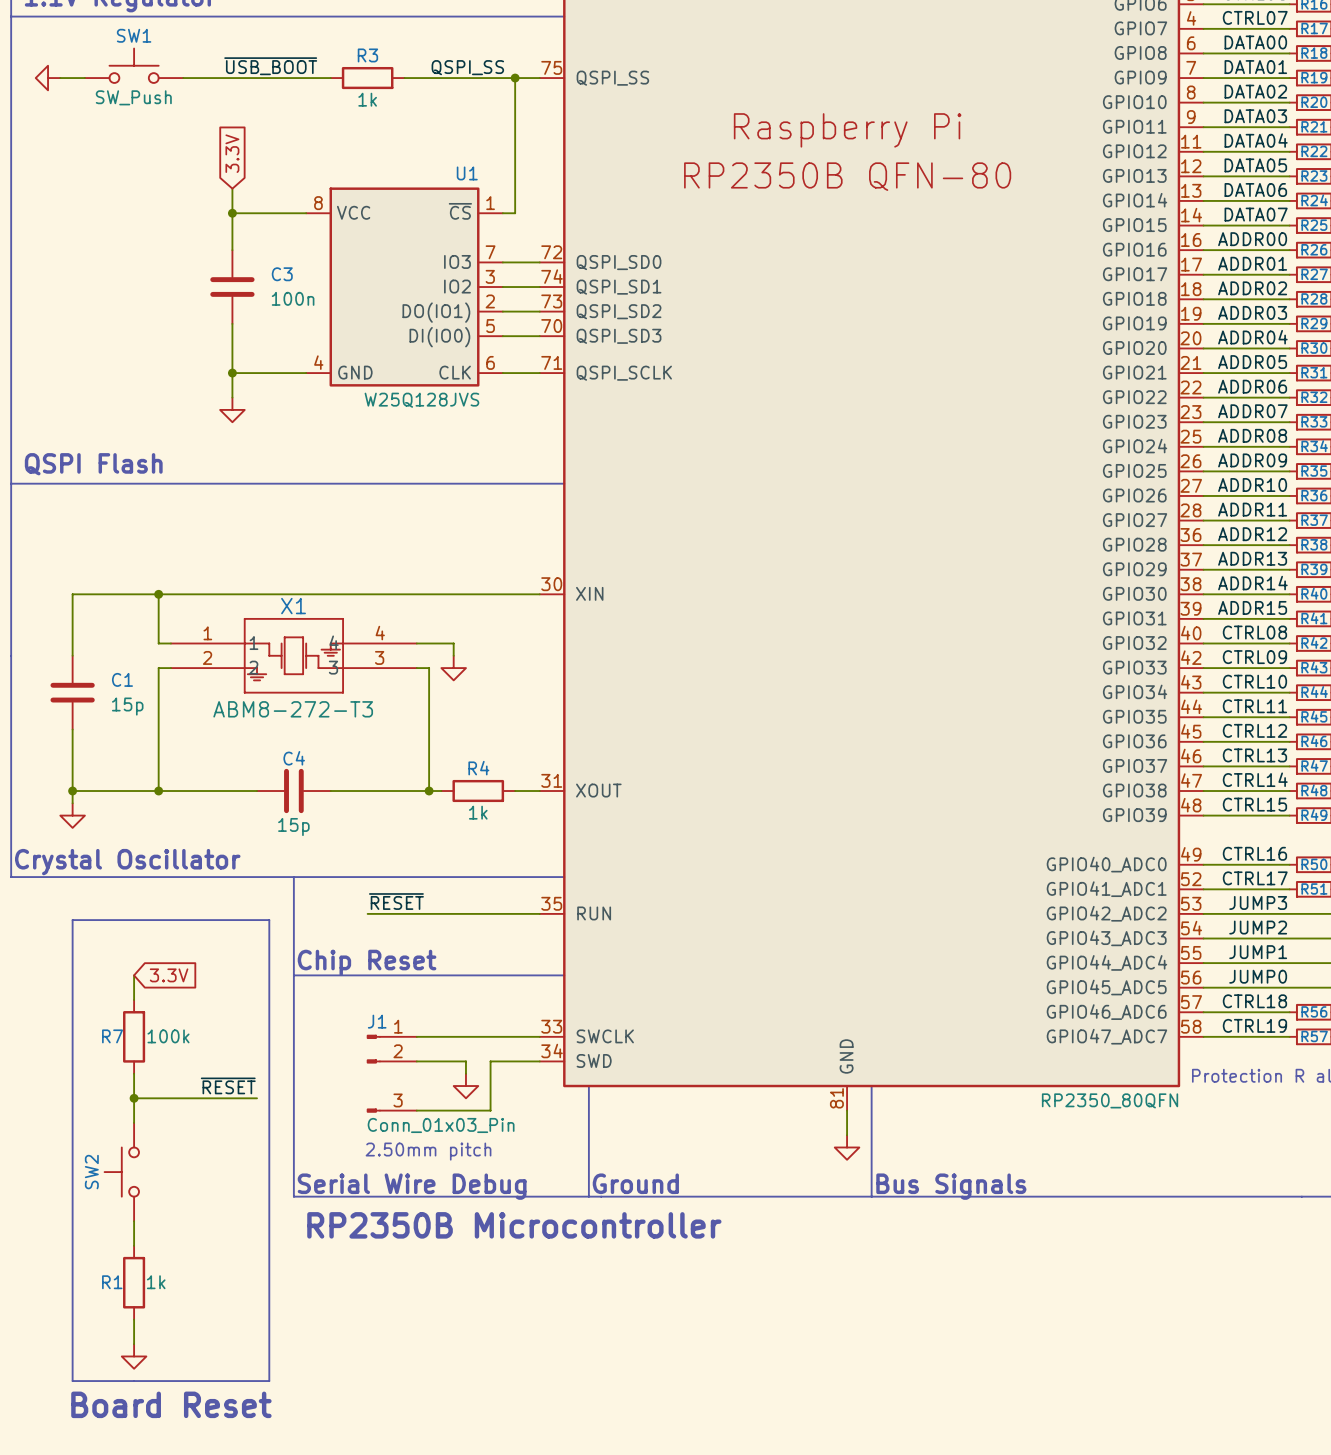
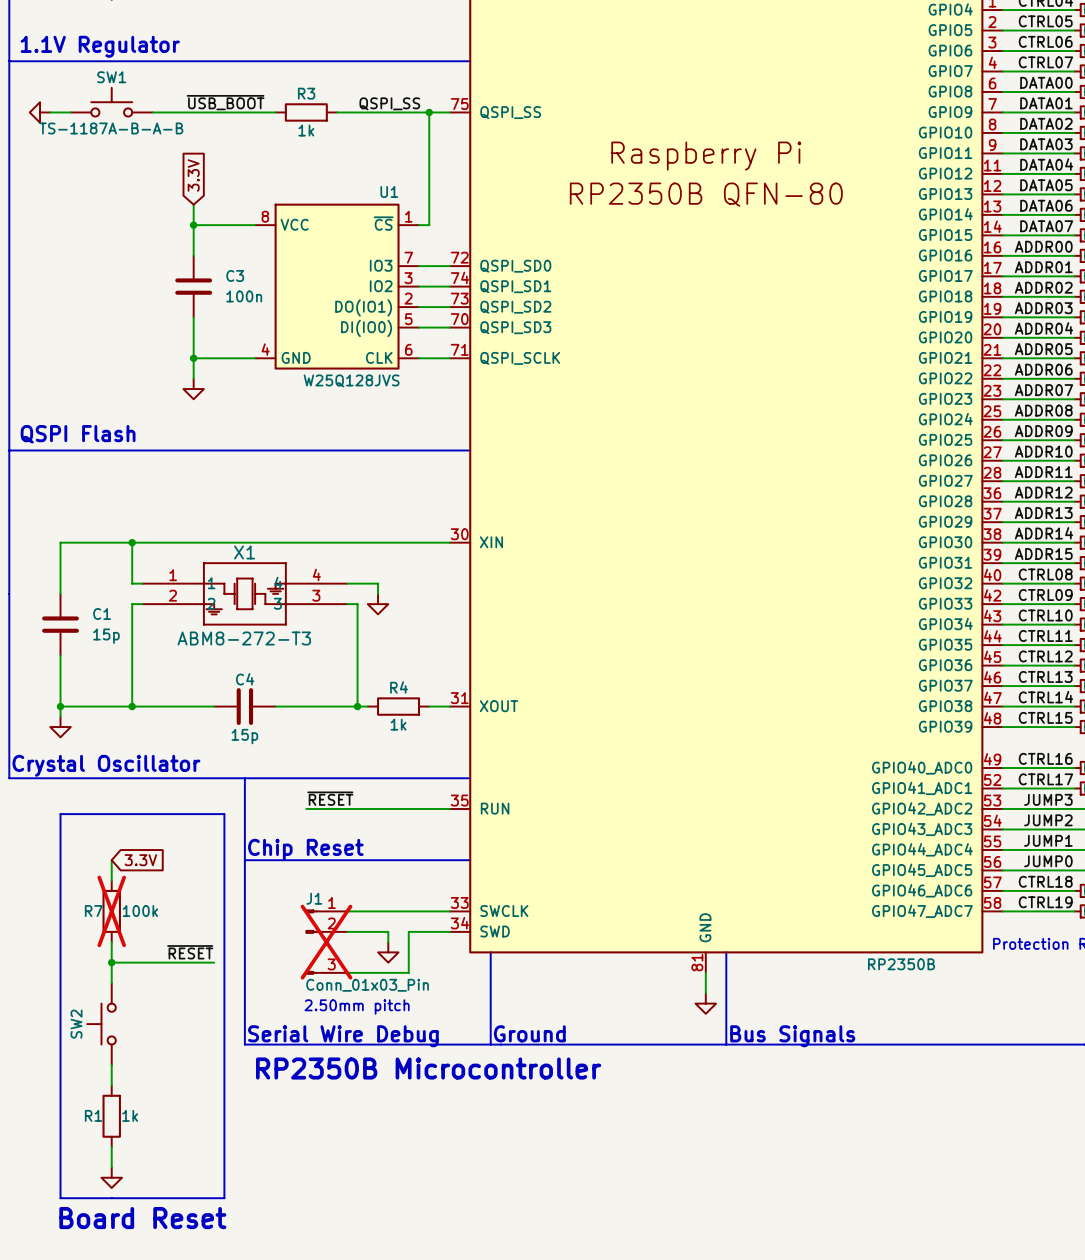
SW1 value: SW_Push (133, 97) -> TS-1187A-B-A-B (111, 128)
R7 do-not-place cross: none -> (111, 911)
J1 do-not-place cross: none -> (326, 942)
part value: RP2350_80QFN (1110, 1100) -> RP2350B (901, 964)

